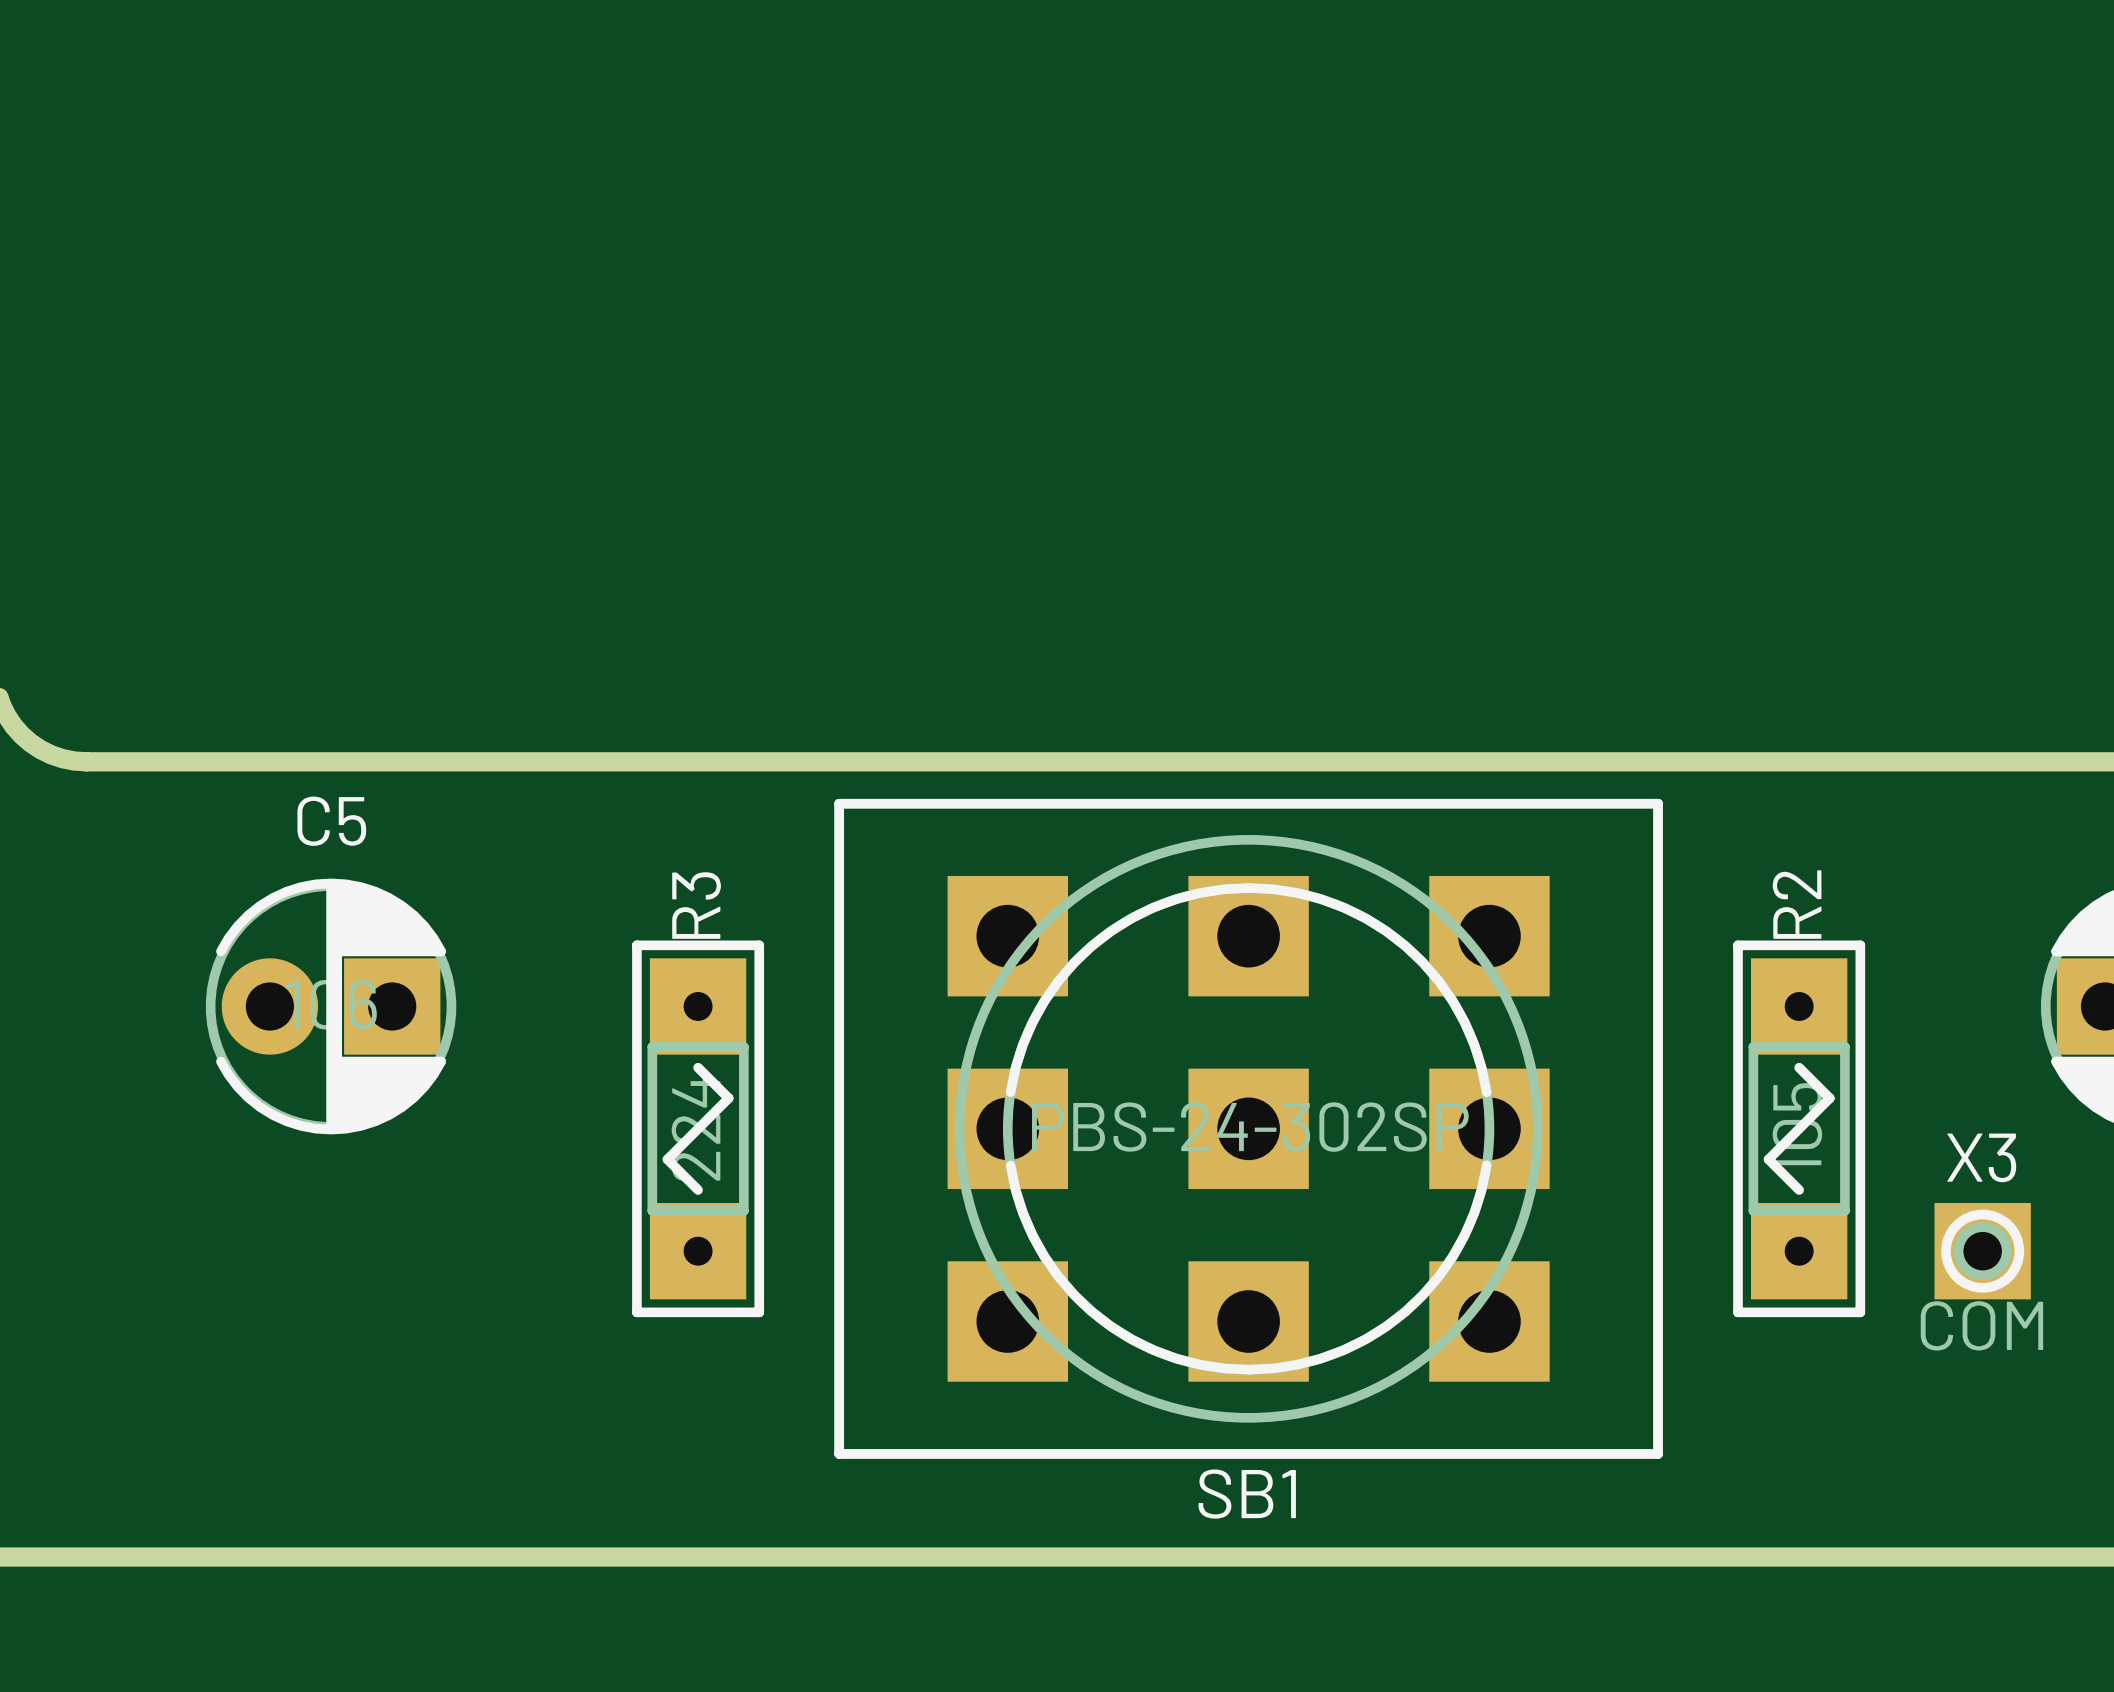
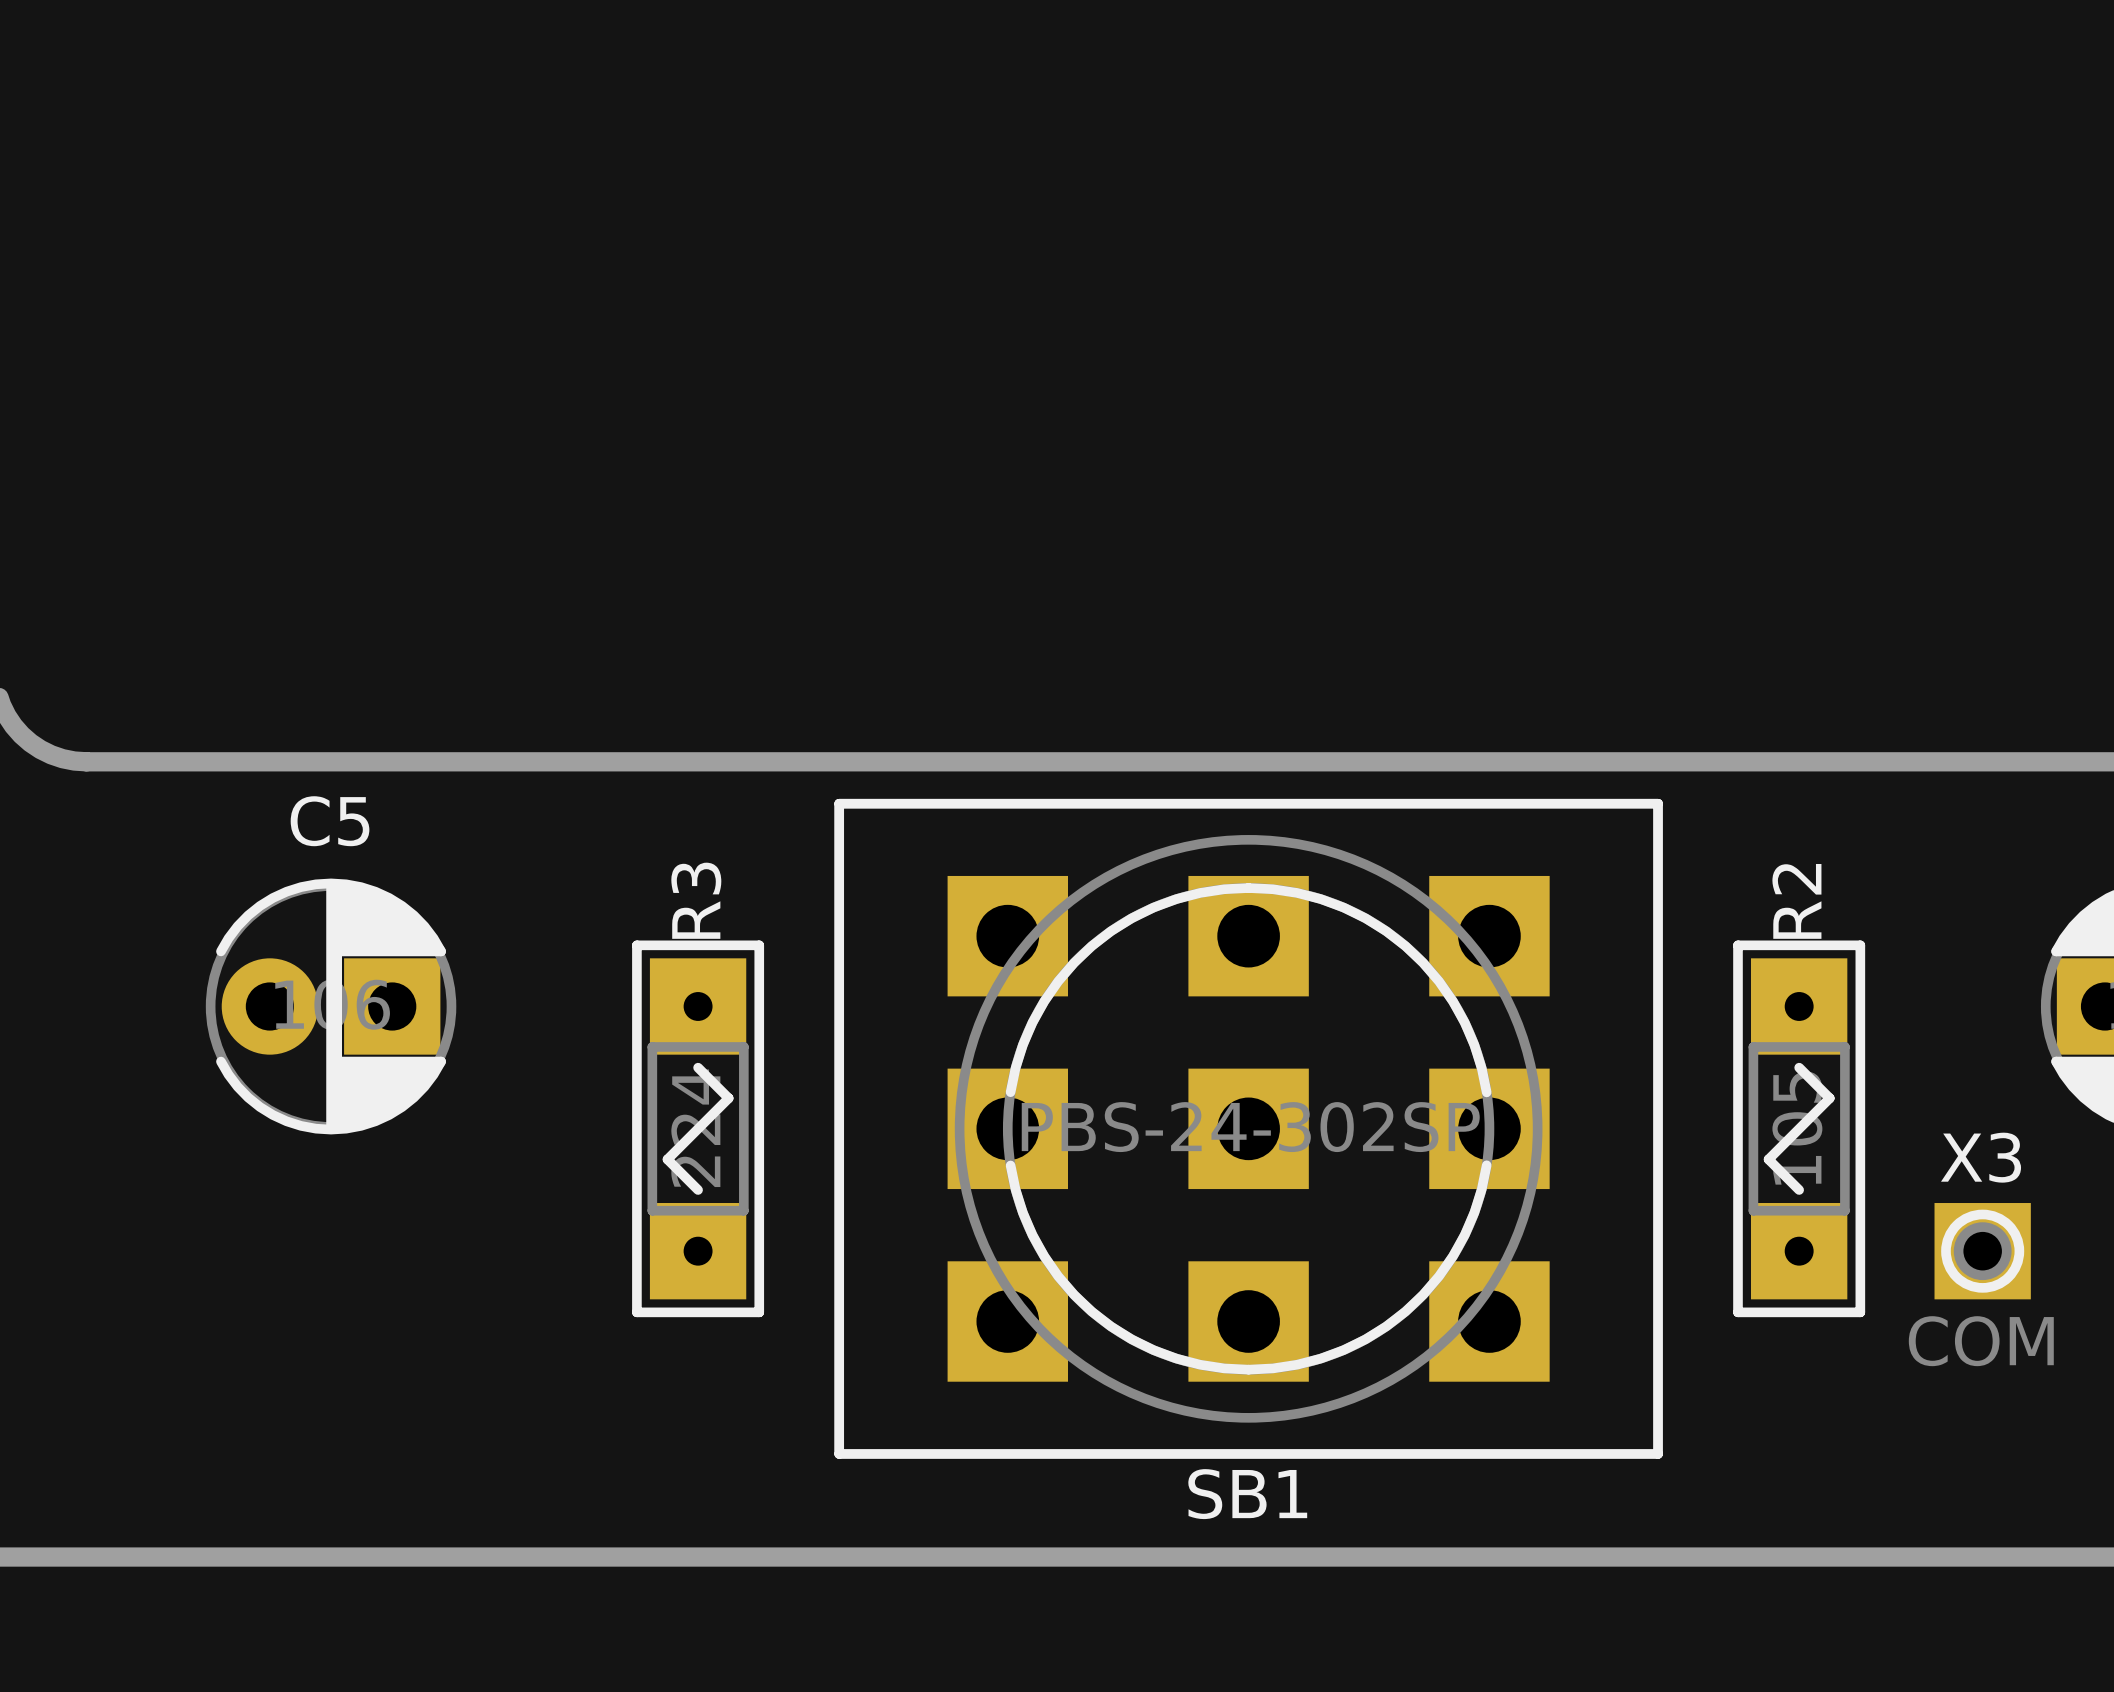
X3 value position: COM (1981, 1325) -> COM (1981, 1341)

